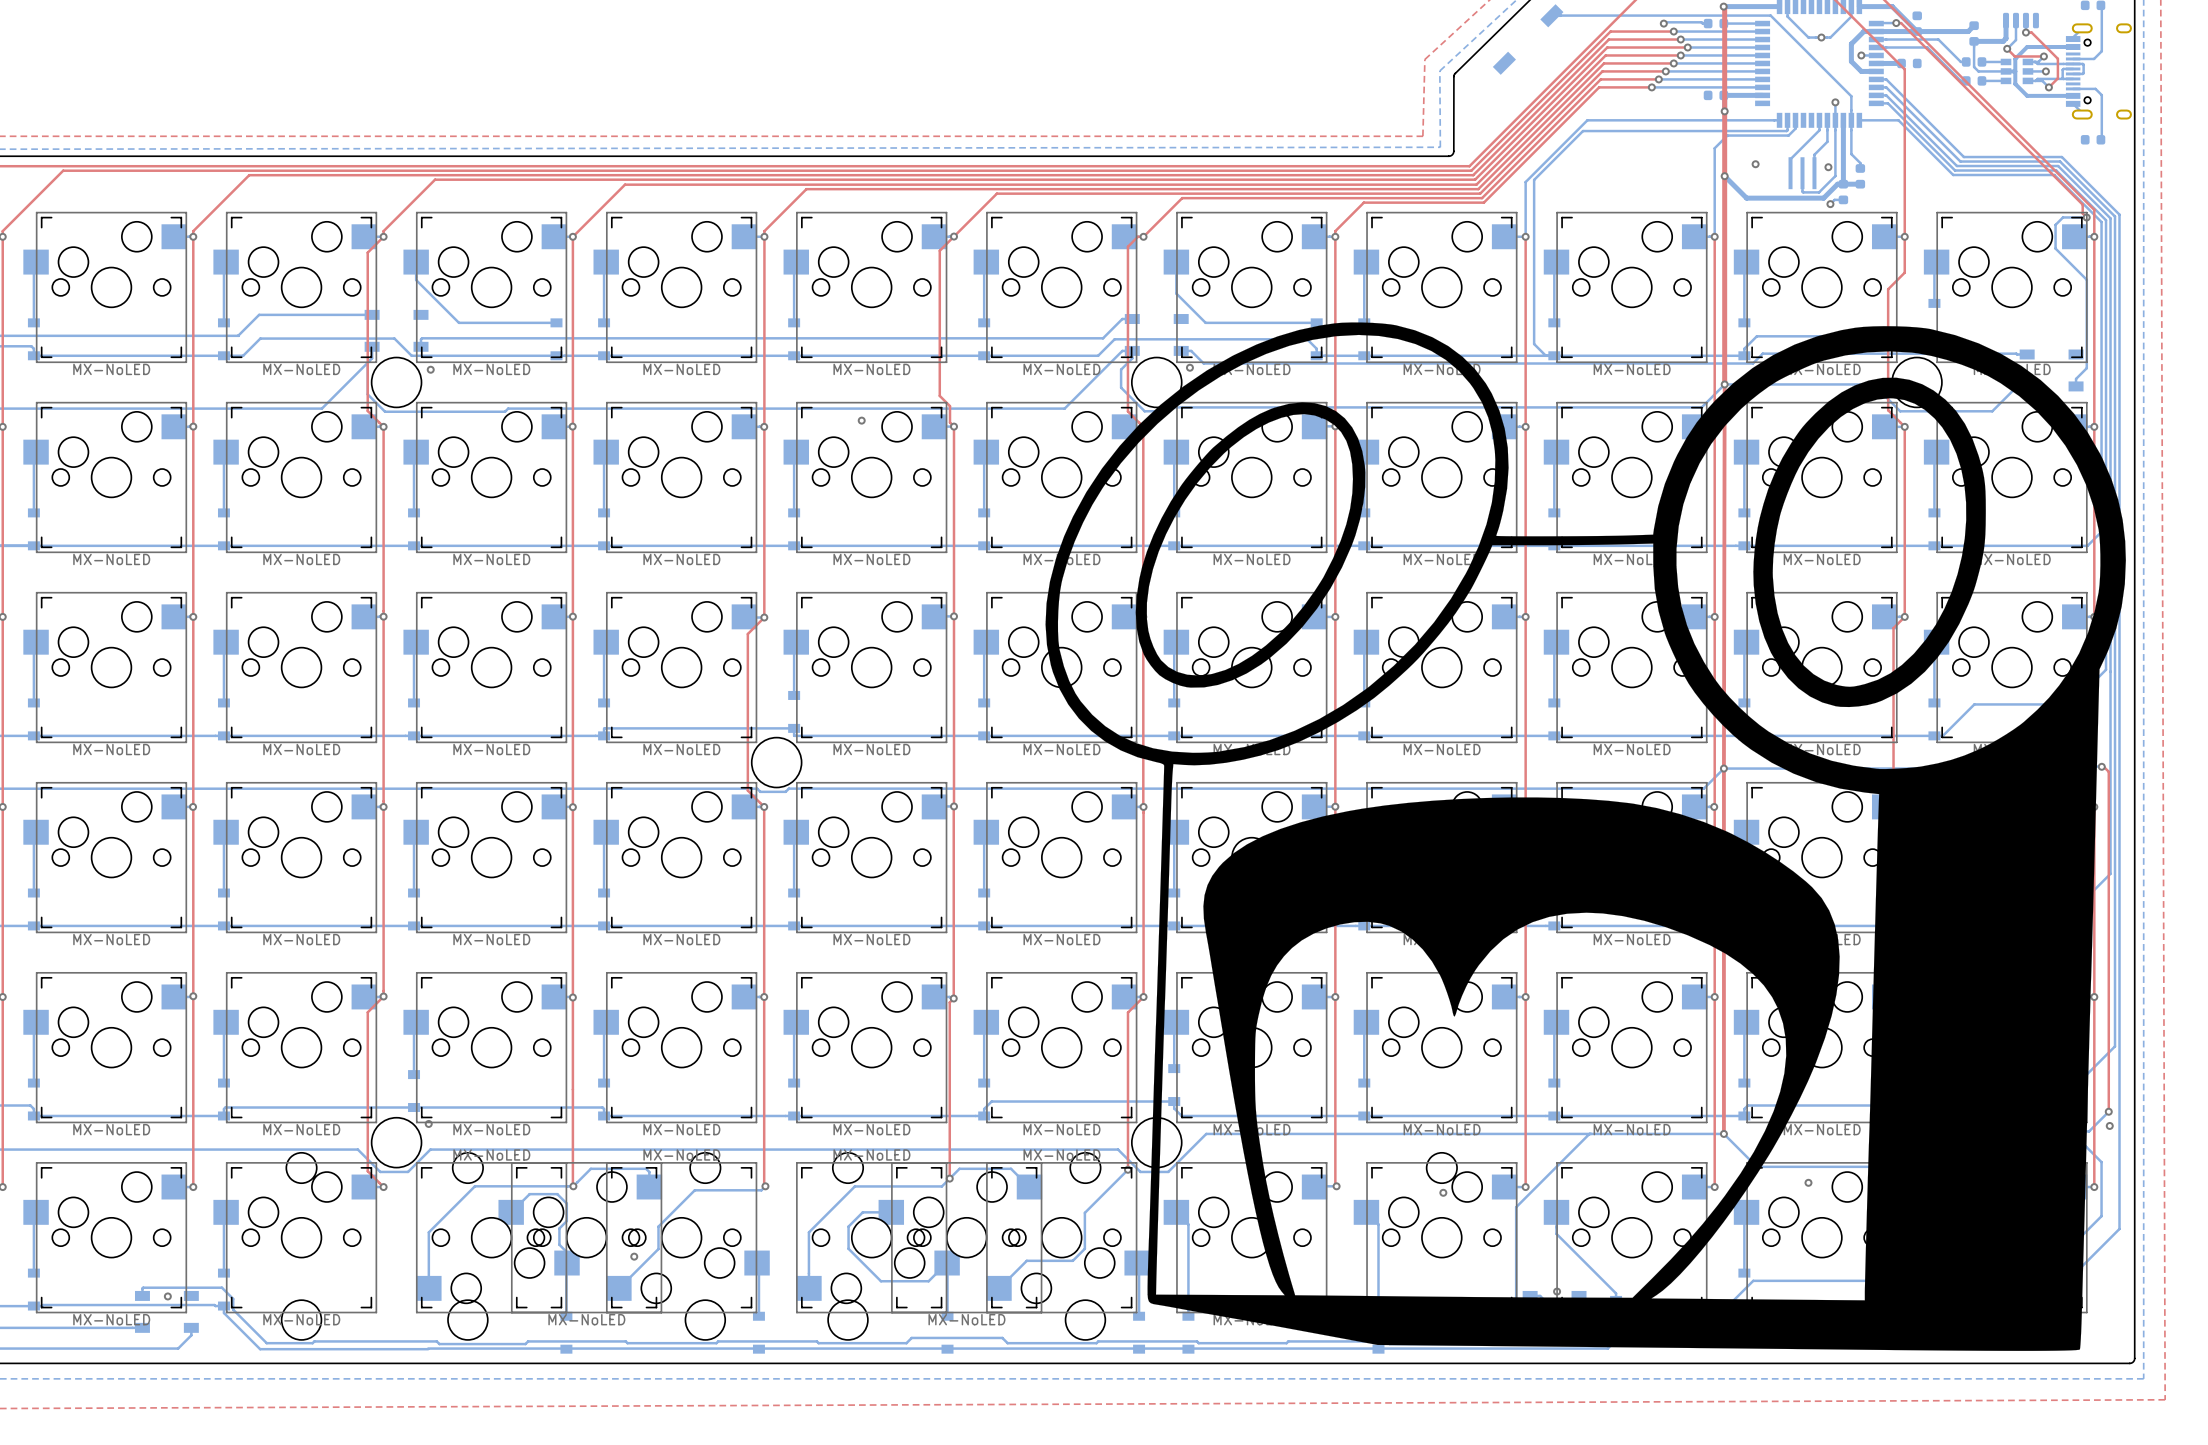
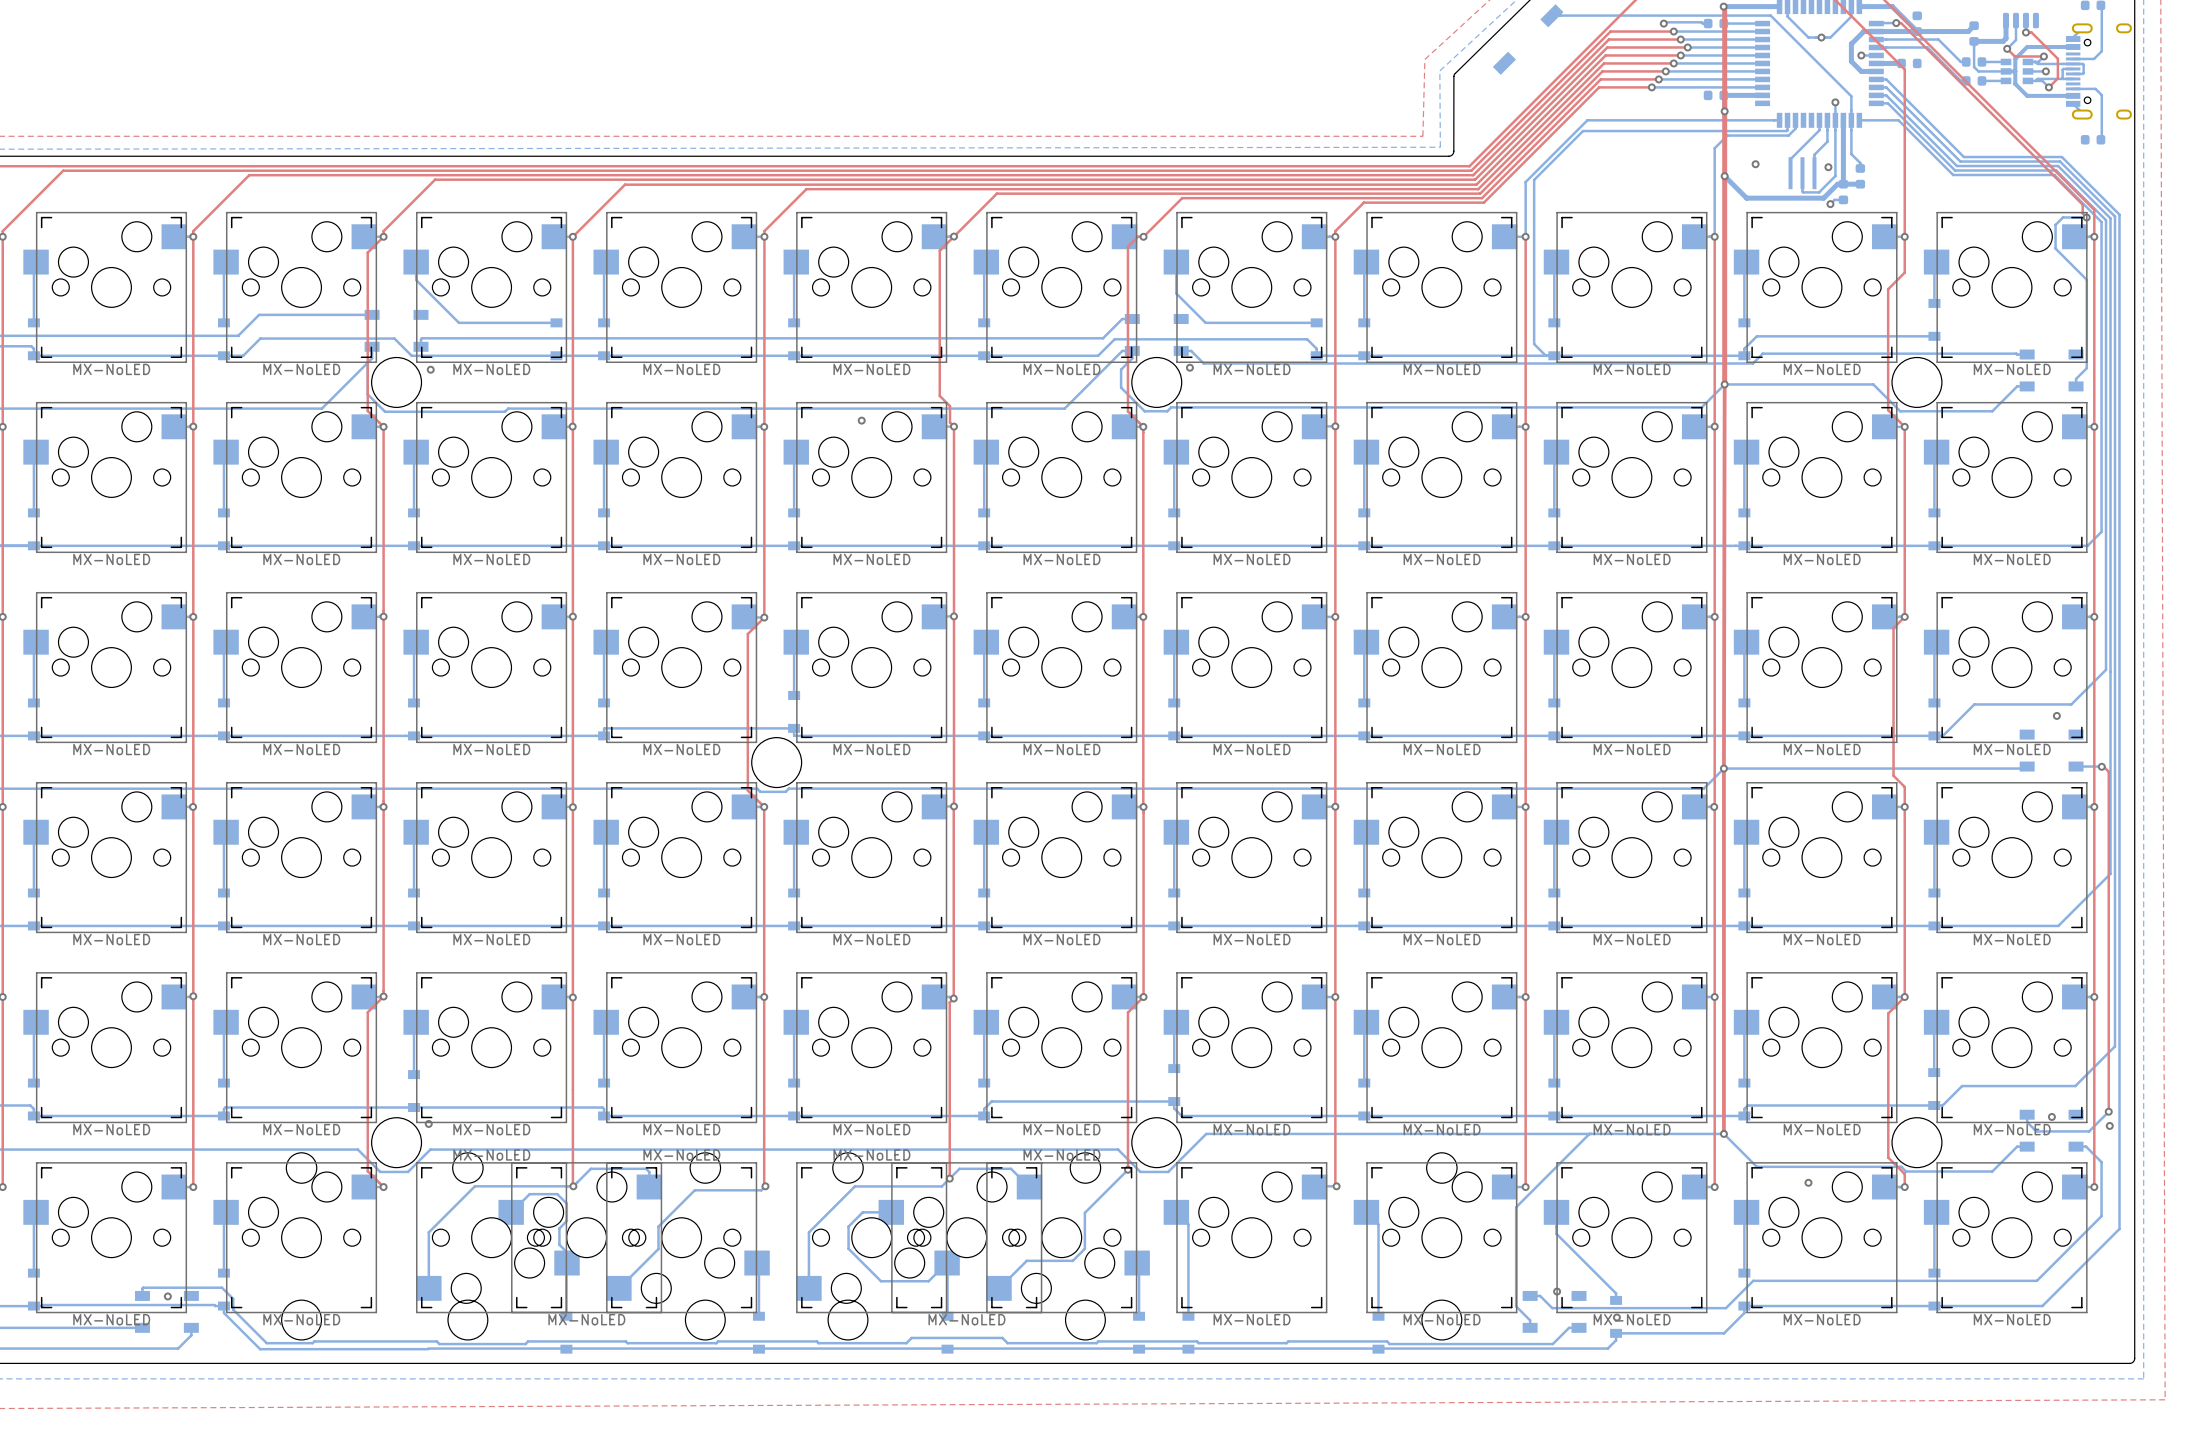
drawing: [1045, 322, 2126, 1351] -> none
via: (1443, 1192) -> none
via: (634, 1256) -> none

